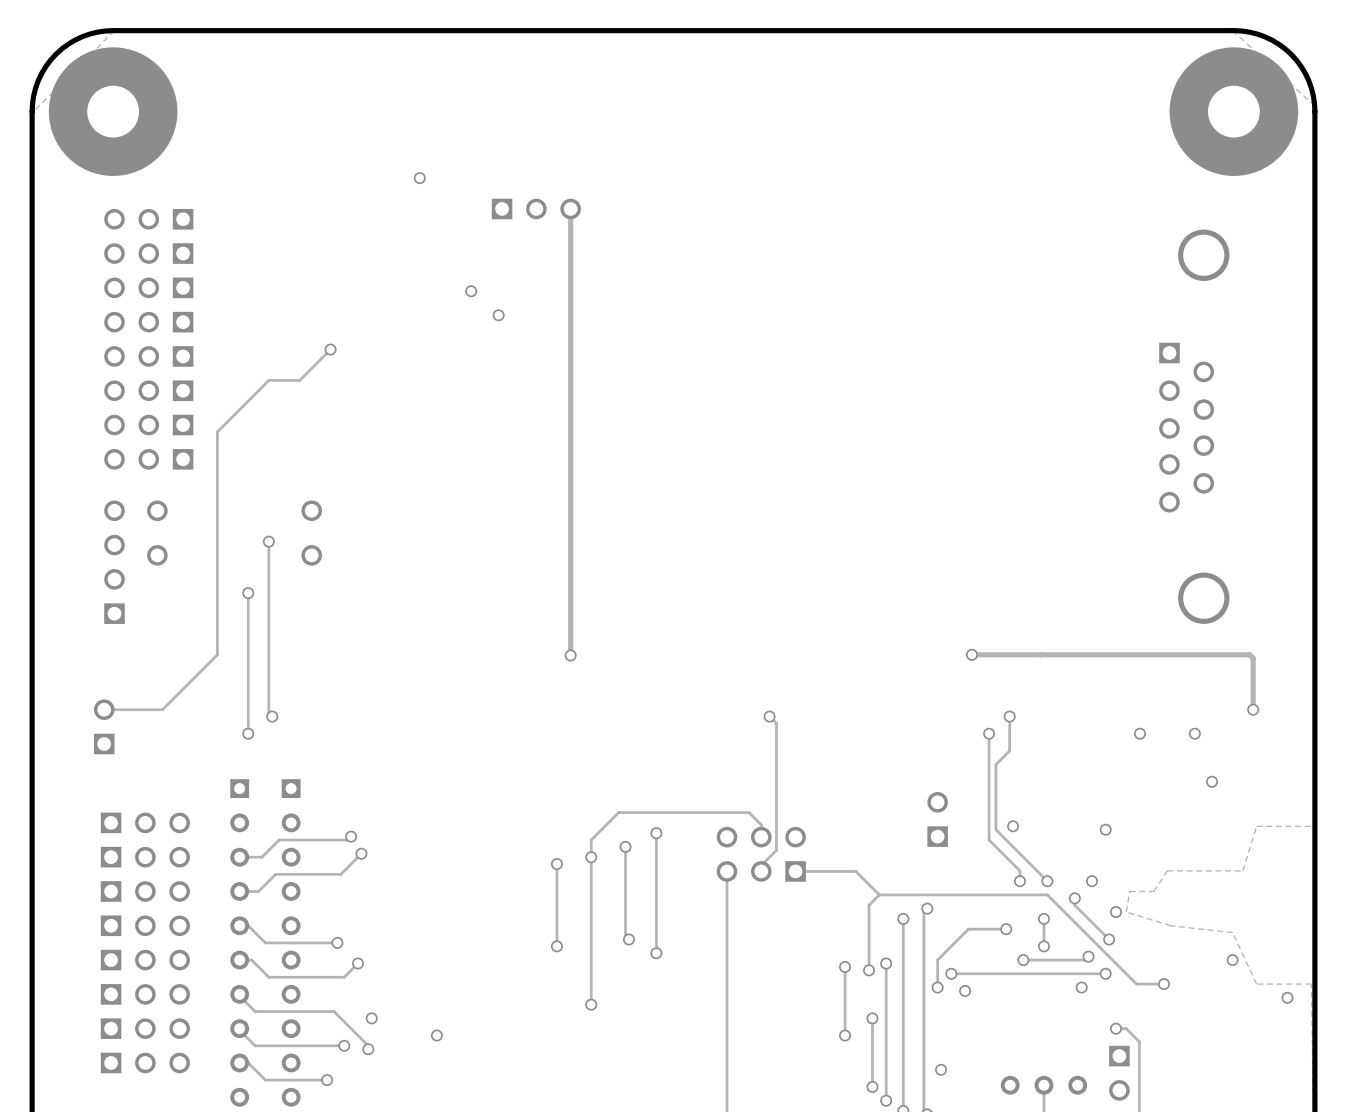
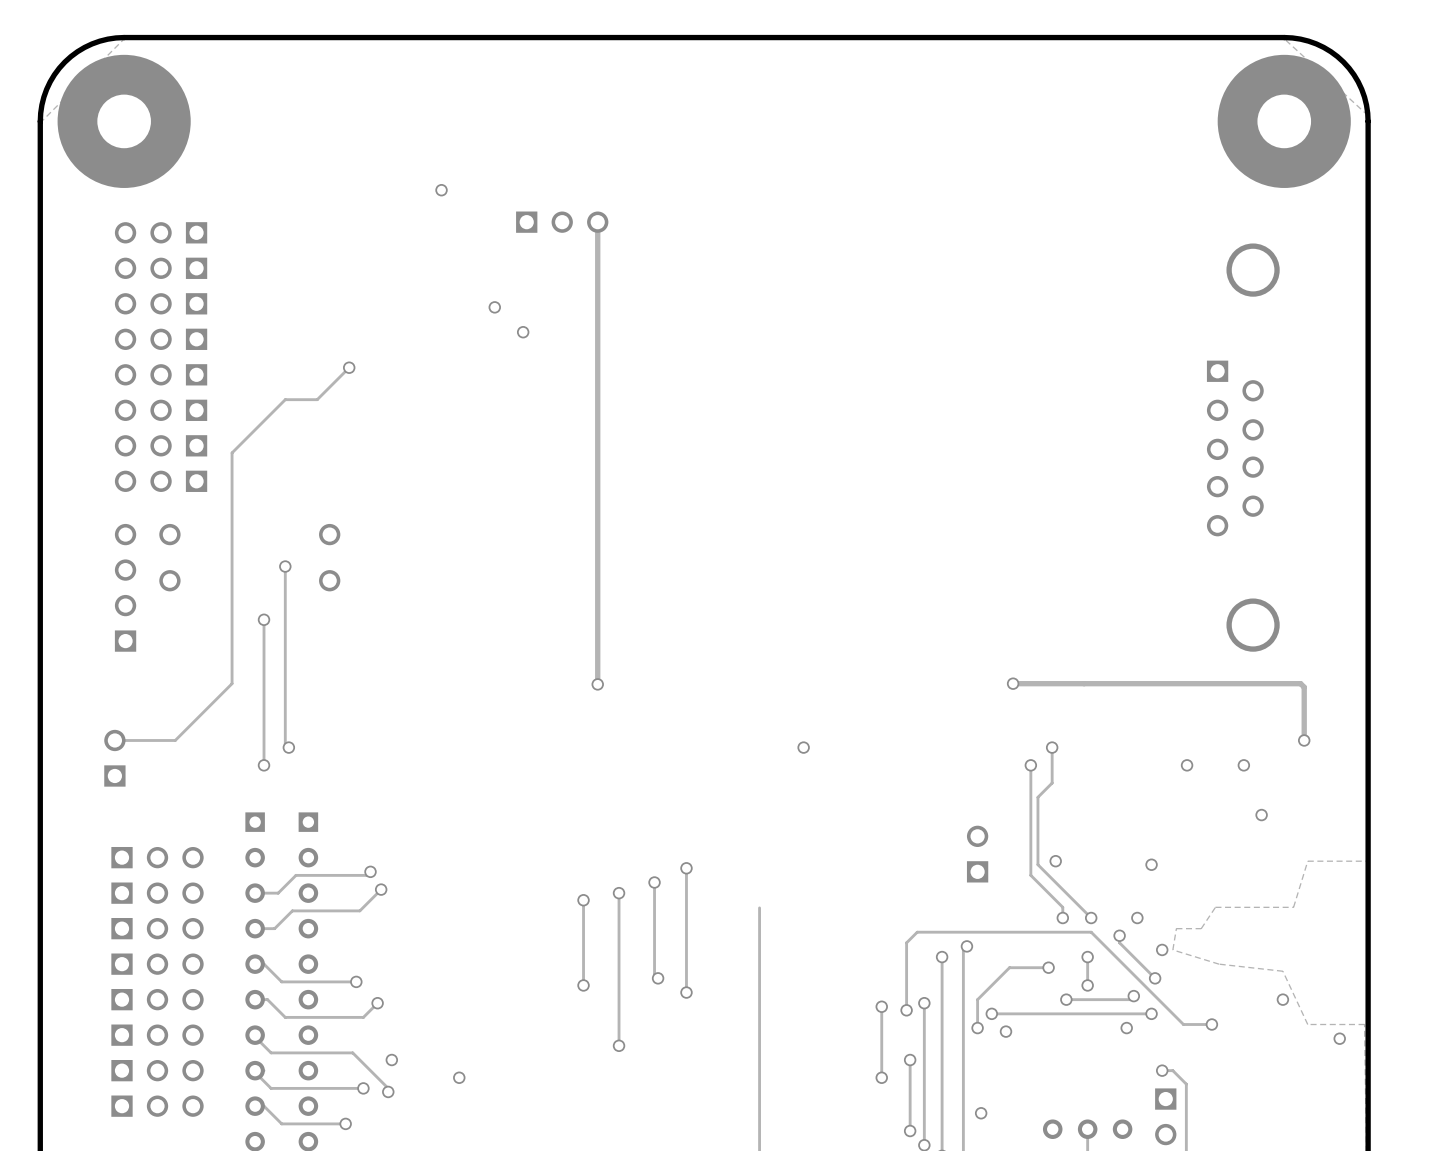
track: (769, 716) (776, 723) (776, 850) (761, 865) (761, 871) -> none
track: (761, 837) (761, 824) (749, 812) (618, 812) (591, 840) (591, 857) -> none
part: (761, 854) -> none
track: (795, 871) (855, 871) (879, 894) -> none

